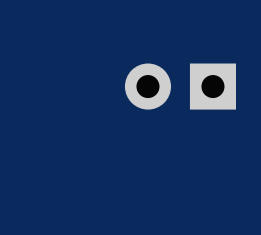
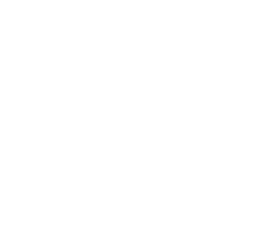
part: (180, 86) -> none

